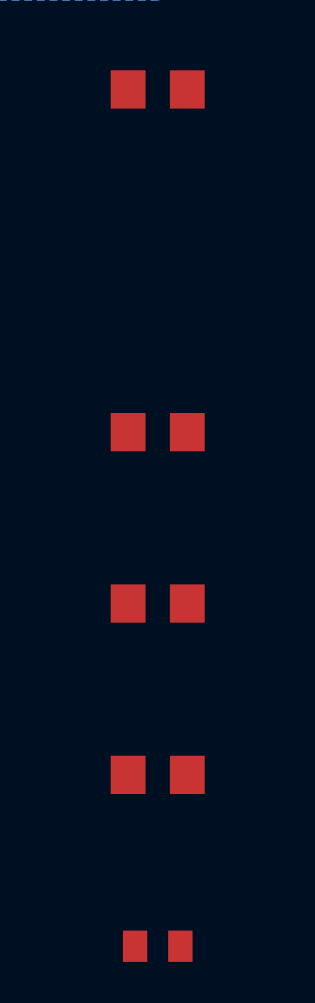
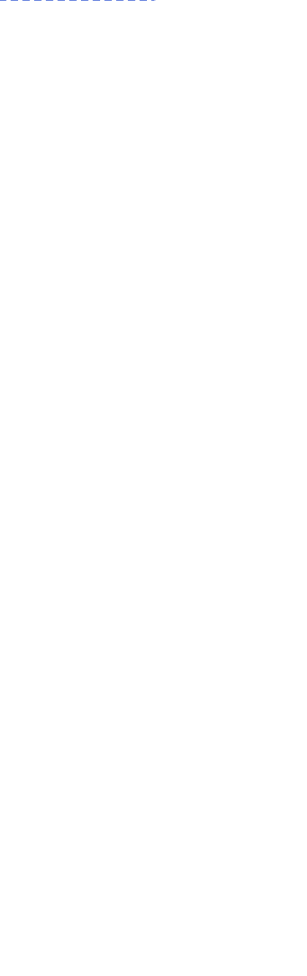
part: (157, 89) -> none
part: (157, 432) -> none
part: (157, 603) -> none
part: (157, 774) -> none
part: (157, 946) -> none

